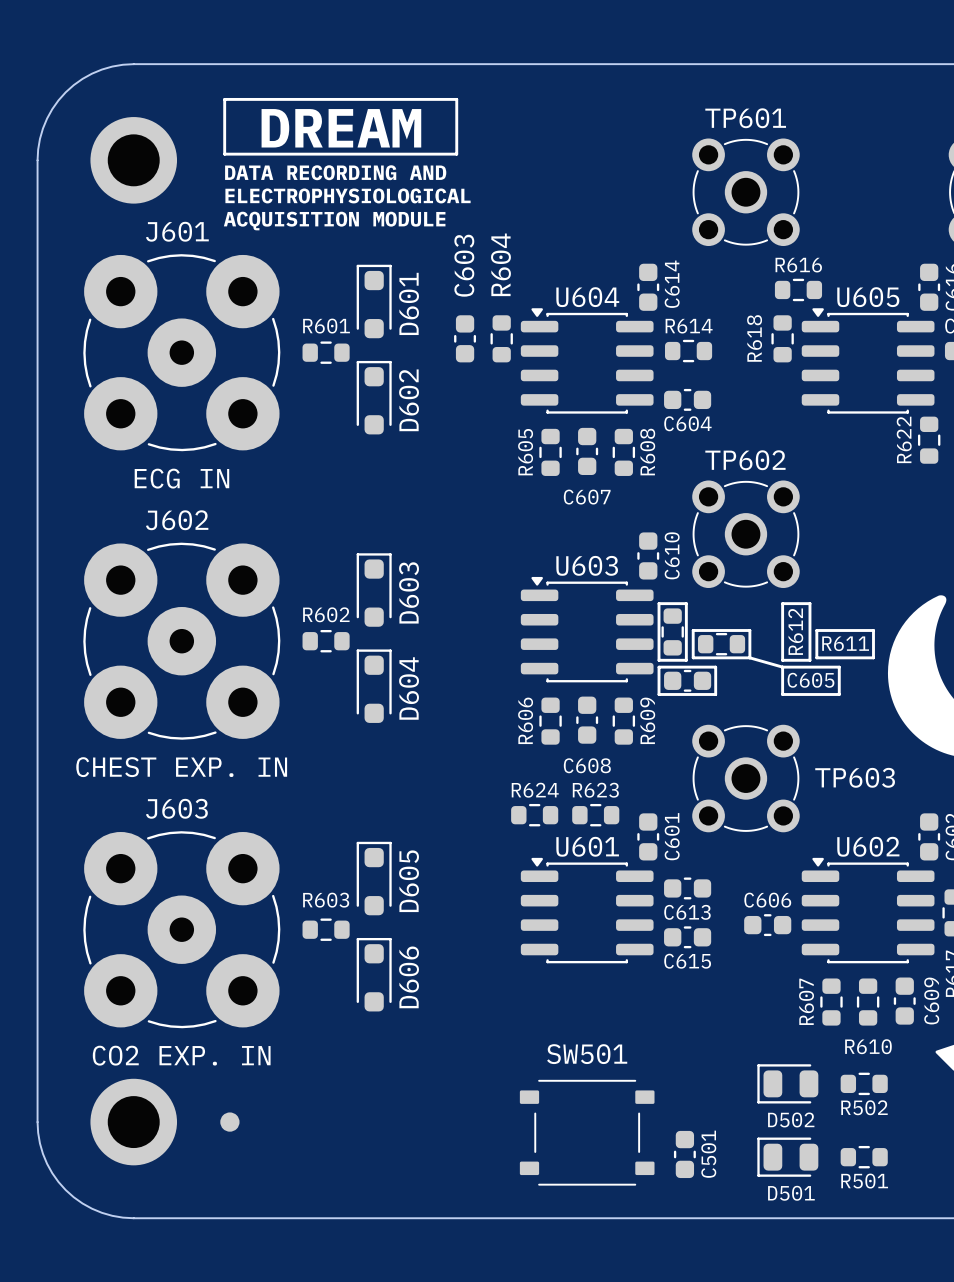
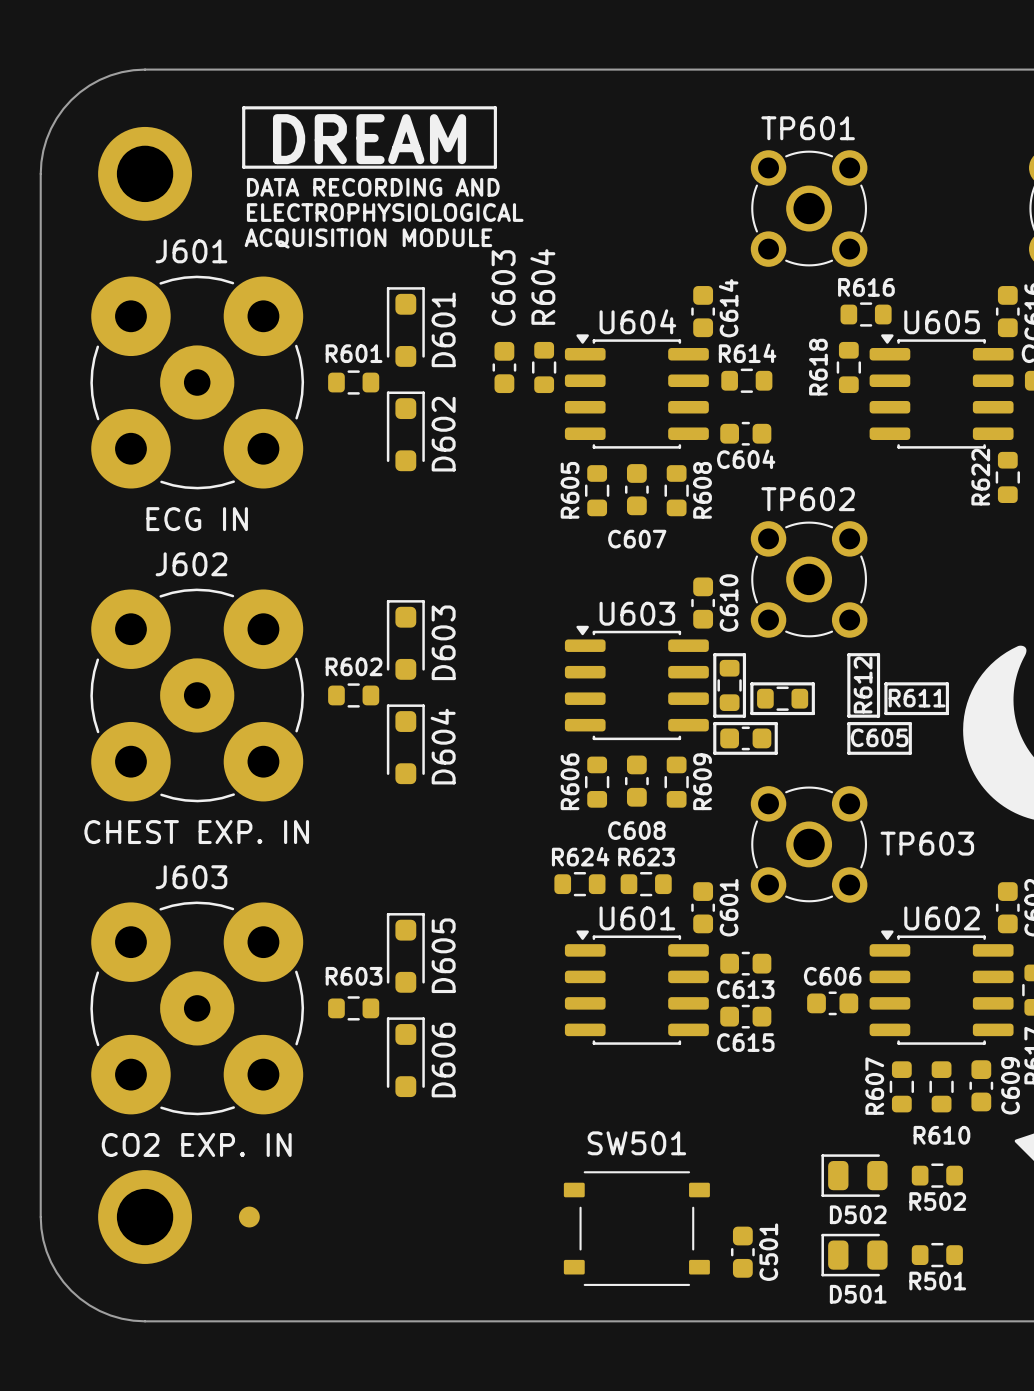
line: (749, 657) (782, 667) -> none

